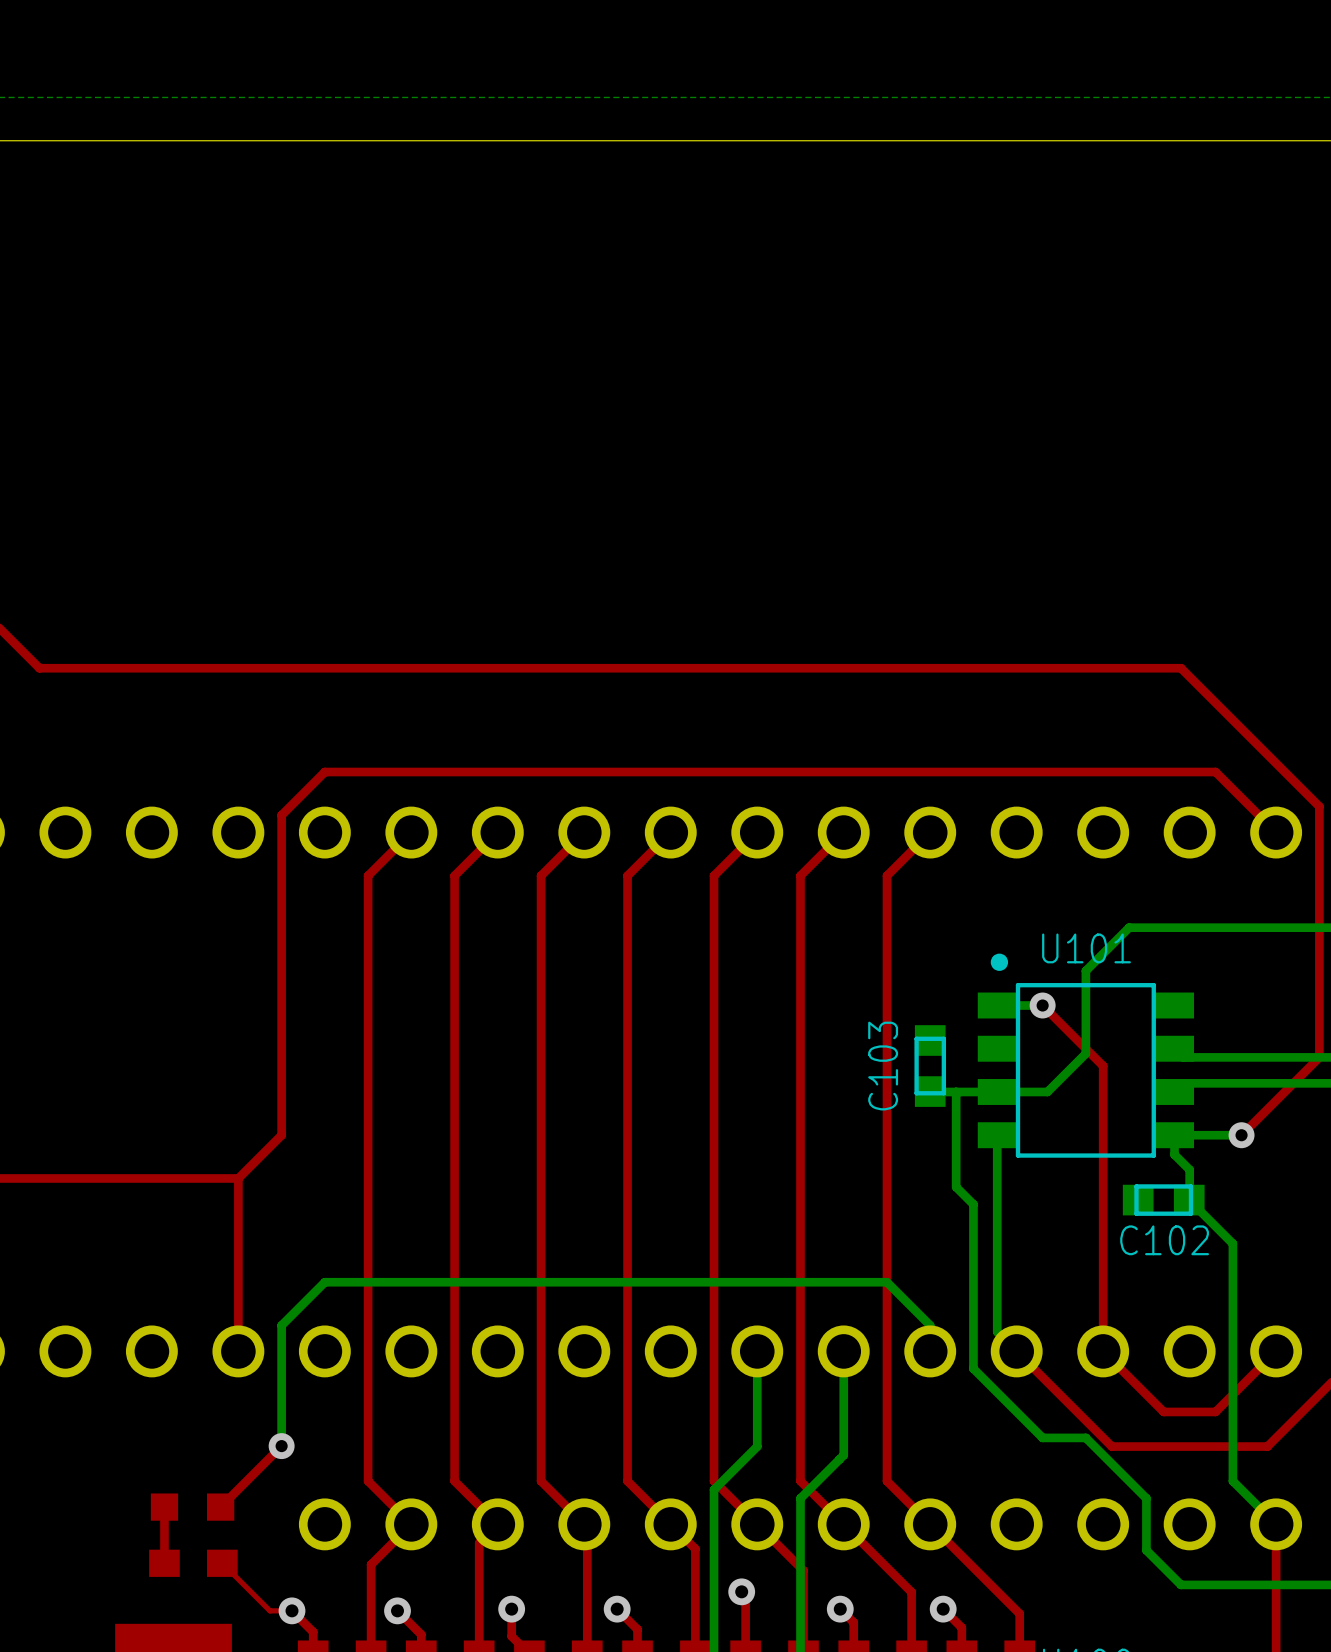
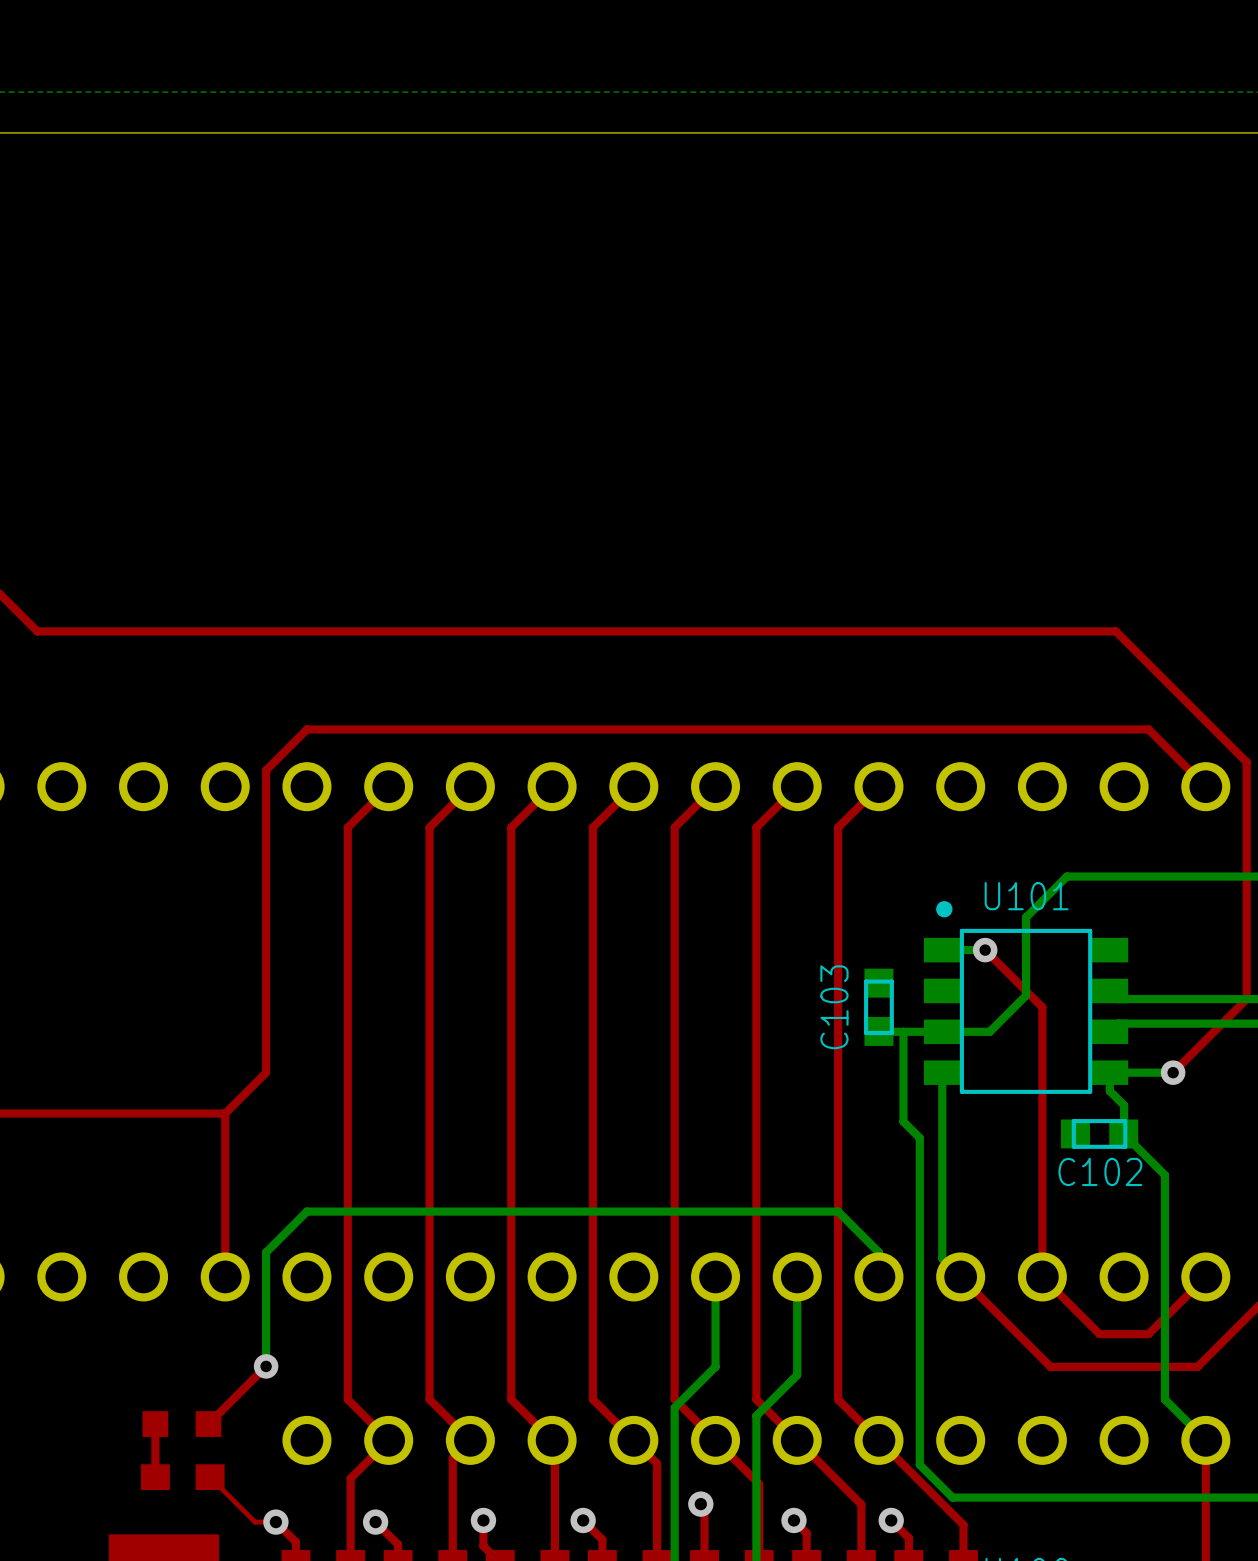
bottom track: (973, 1368) (1042, 1437) (1085, 1437) (1146, 1498) (1146, 1550) (1181, 1584) -> (919, 1293) (919, 1464) (952, 1497) (1115, 1497)

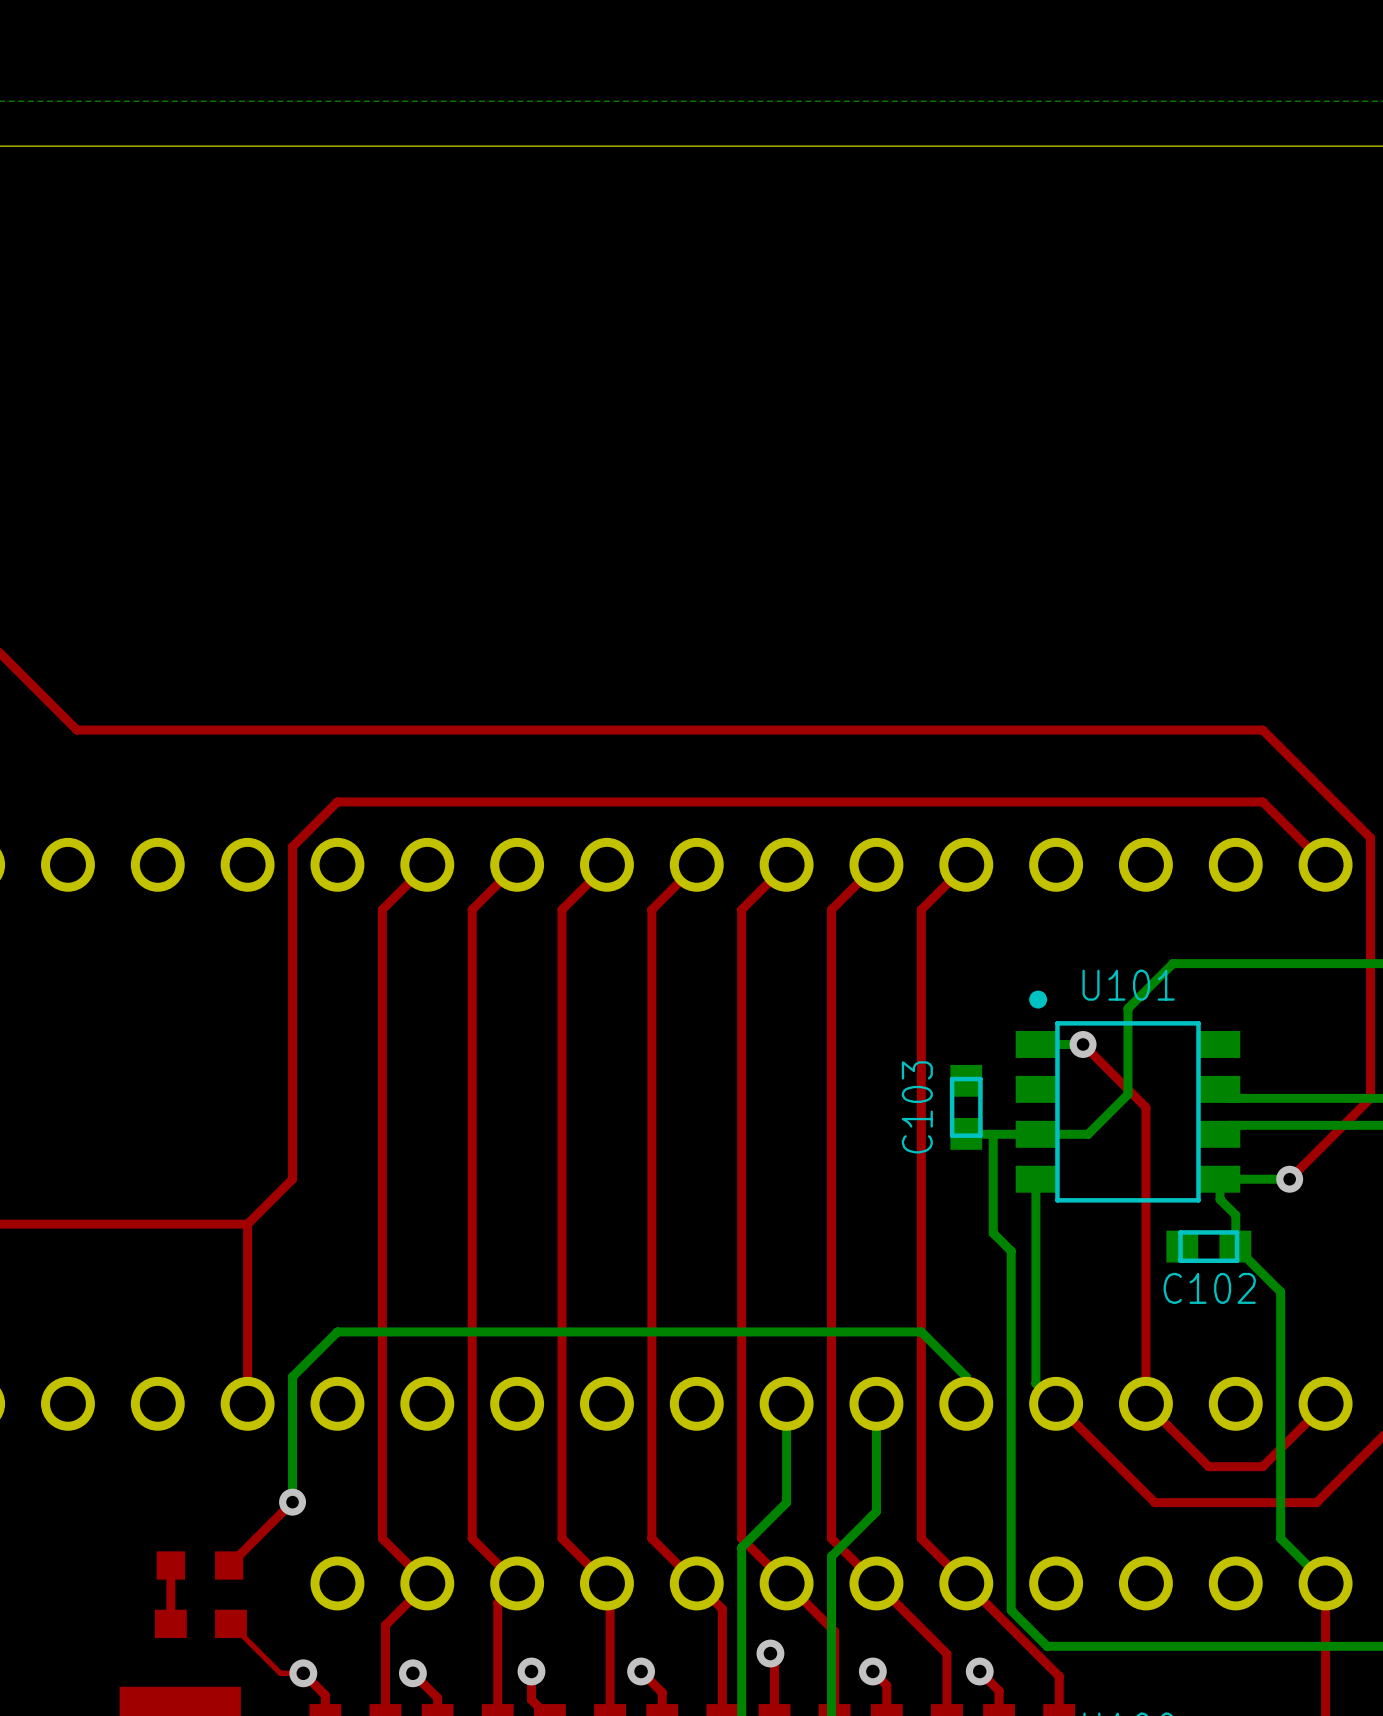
top track: (37, 631) (1115, 631) (1148, 664) -> (41, 694) (76, 730) (1262, 730)

